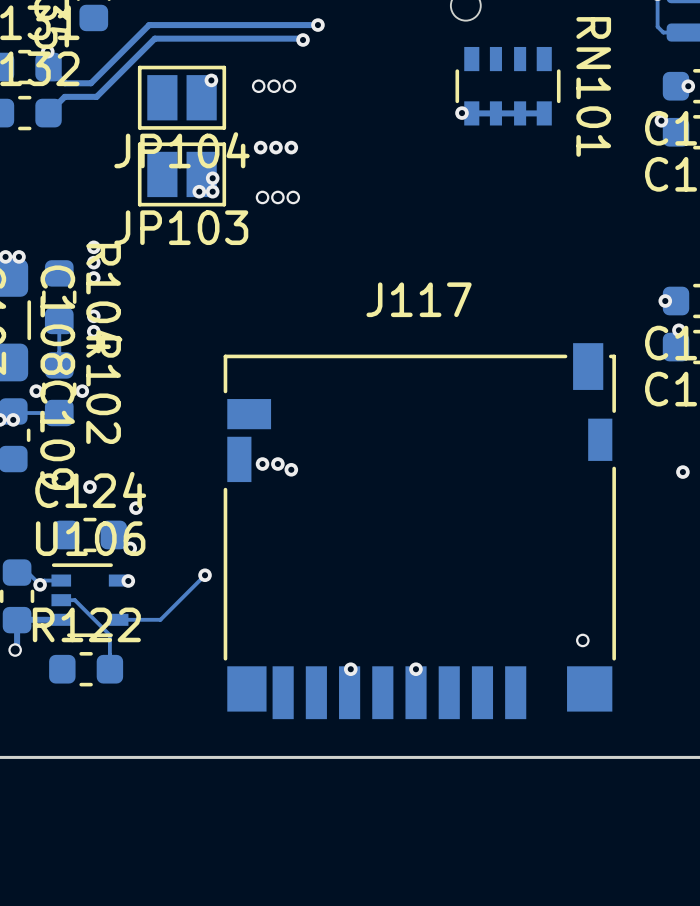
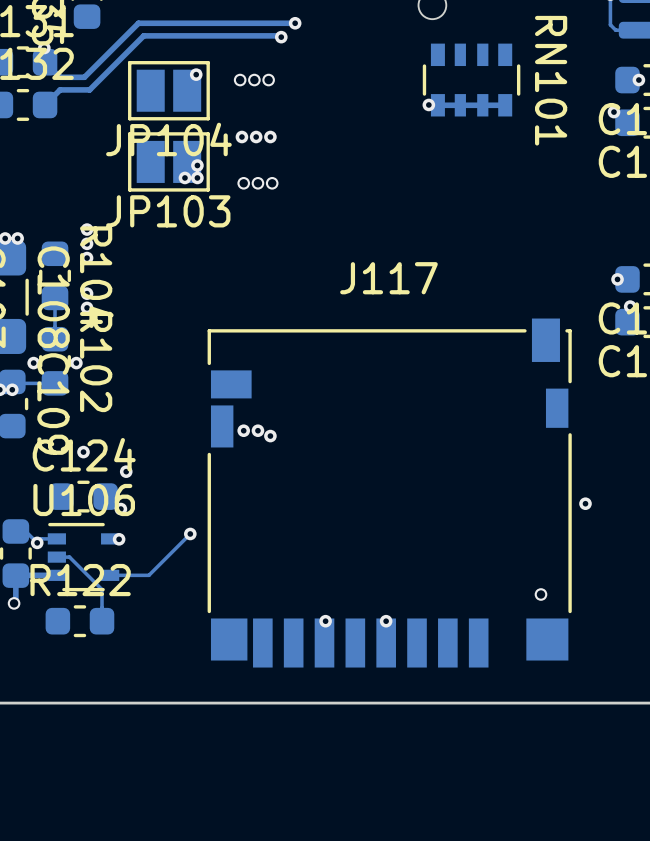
via position: (682, 472) -> (585, 503)

